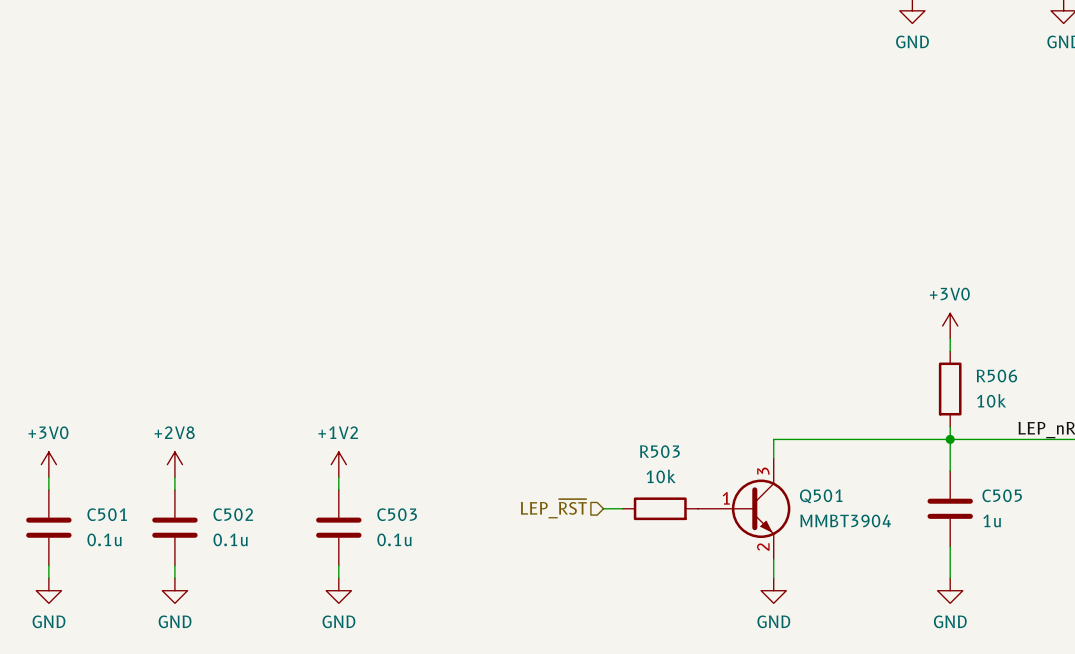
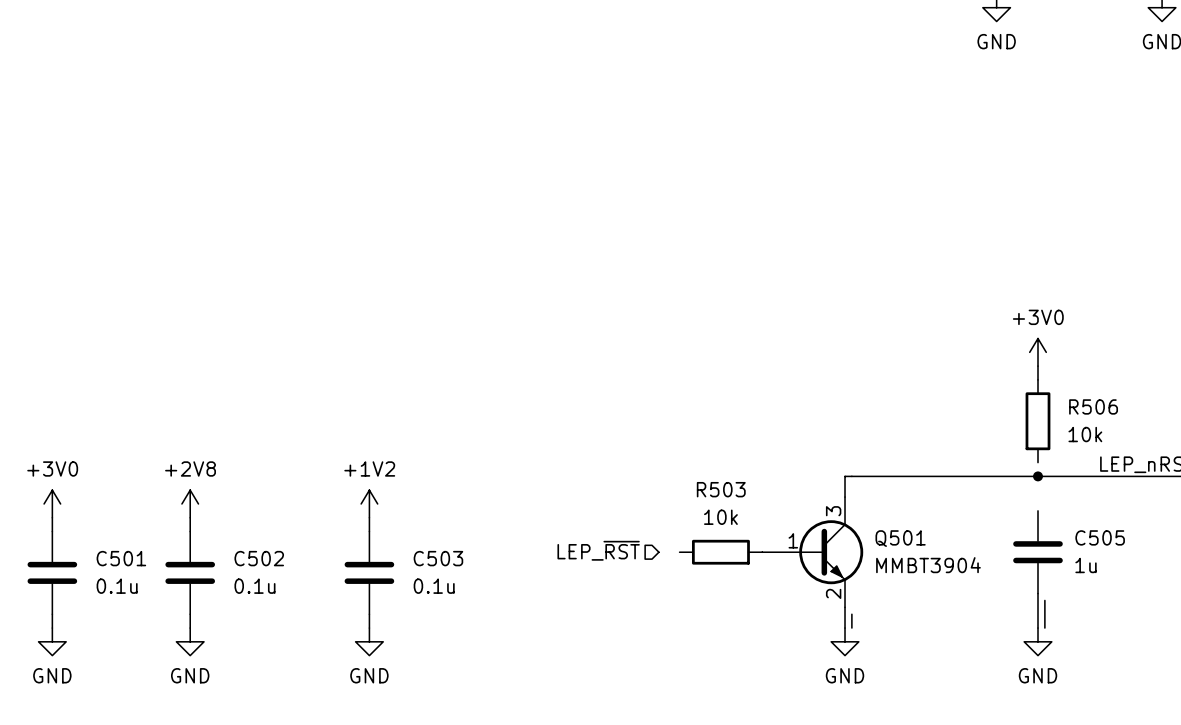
wire: (950, 426) (950, 470) -> none
wire: (603, 508) (622, 508) -> none
wire: none -> (1044, 600) (1044, 628)
wire: none -> (851, 614) (851, 628)

